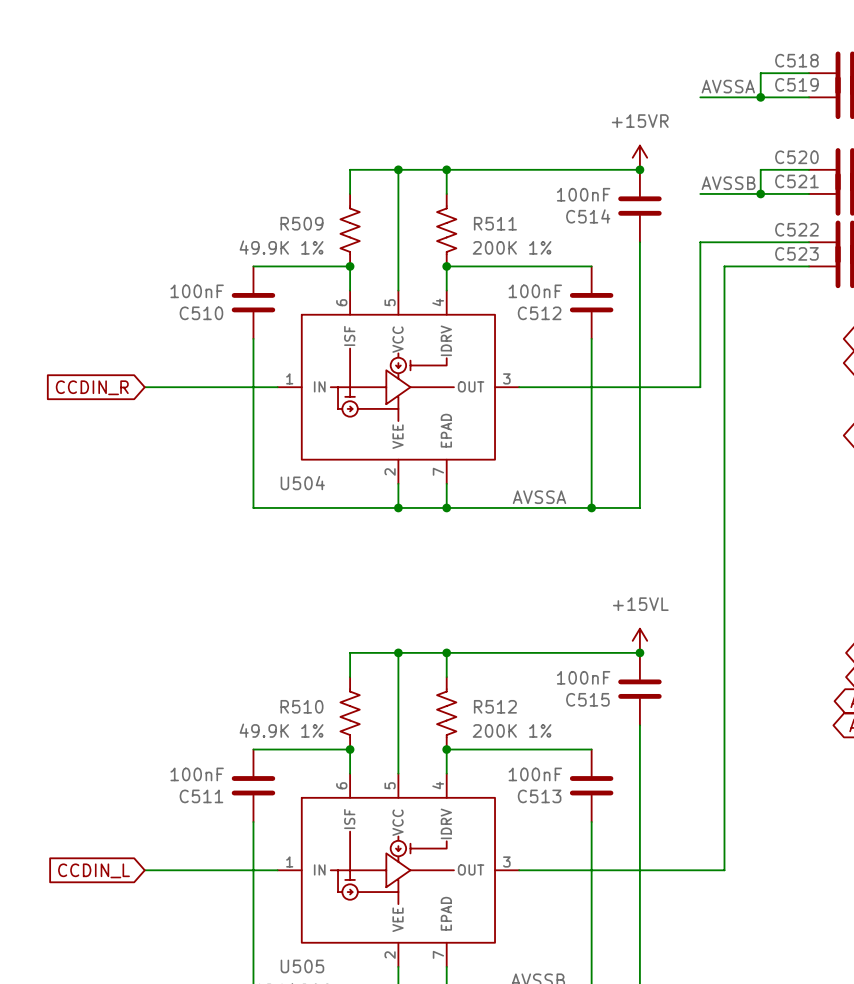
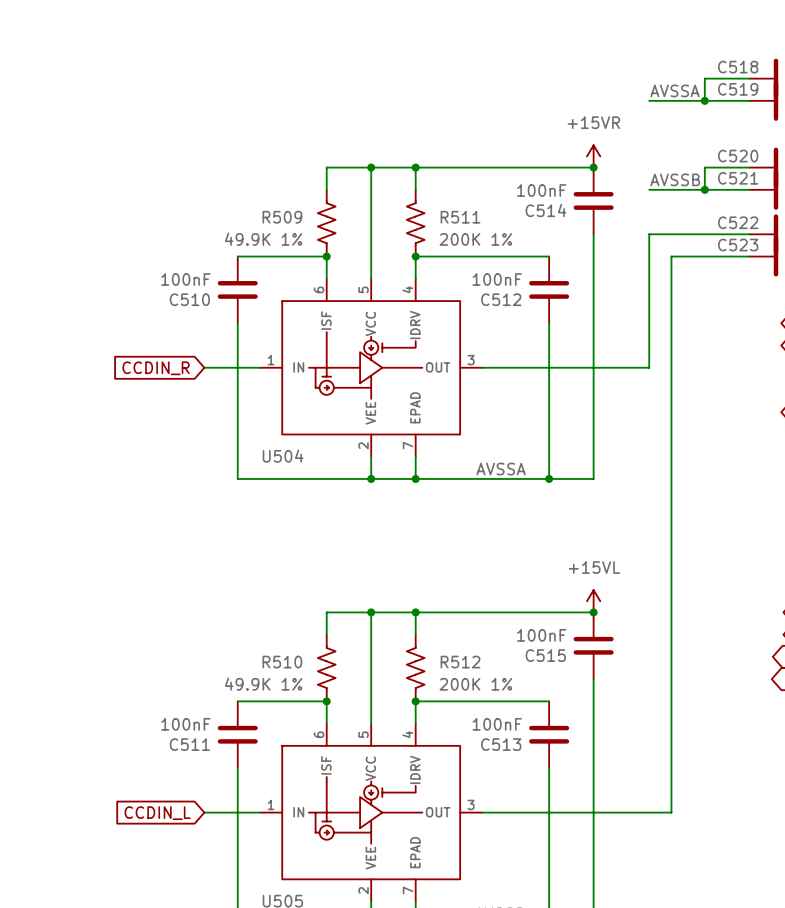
global label position: CCDIN_R (92, 387) -> CCDIN_R (156, 368)
wire: (144, 387) (217, 387) -> none
global label position: CCDIN_L (94, 870) -> CCDIN_L (157, 813)
wire: (144, 870) (217, 870) -> none

